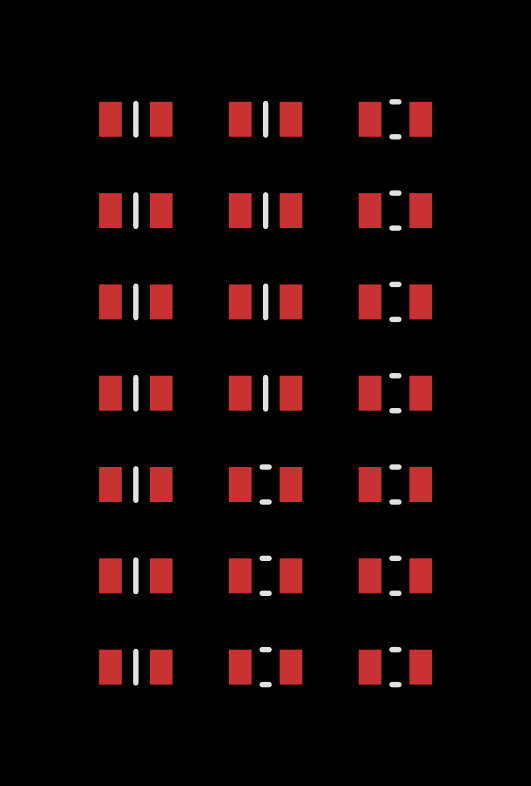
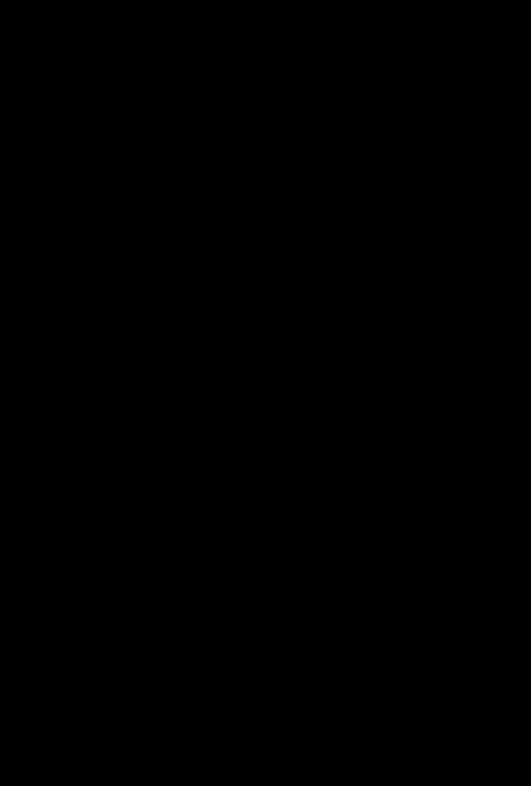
part: (135, 119) -> none
part: (265, 119) -> none
part: (395, 119) -> none
part: (135, 210) -> none
part: (265, 210) -> none
part: (395, 210) -> none
part: (135, 301) -> none
part: (265, 301) -> none
part: (395, 301) -> none
part: (135, 393) -> none
part: (265, 393) -> none
part: (395, 393) -> none
part: (135, 484) -> none
part: (265, 484) -> none
part: (395, 484) -> none
part: (135, 575) -> none
part: (265, 575) -> none
part: (395, 575) -> none
part: (135, 667) -> none
part: (265, 667) -> none
part: (395, 667) -> none

